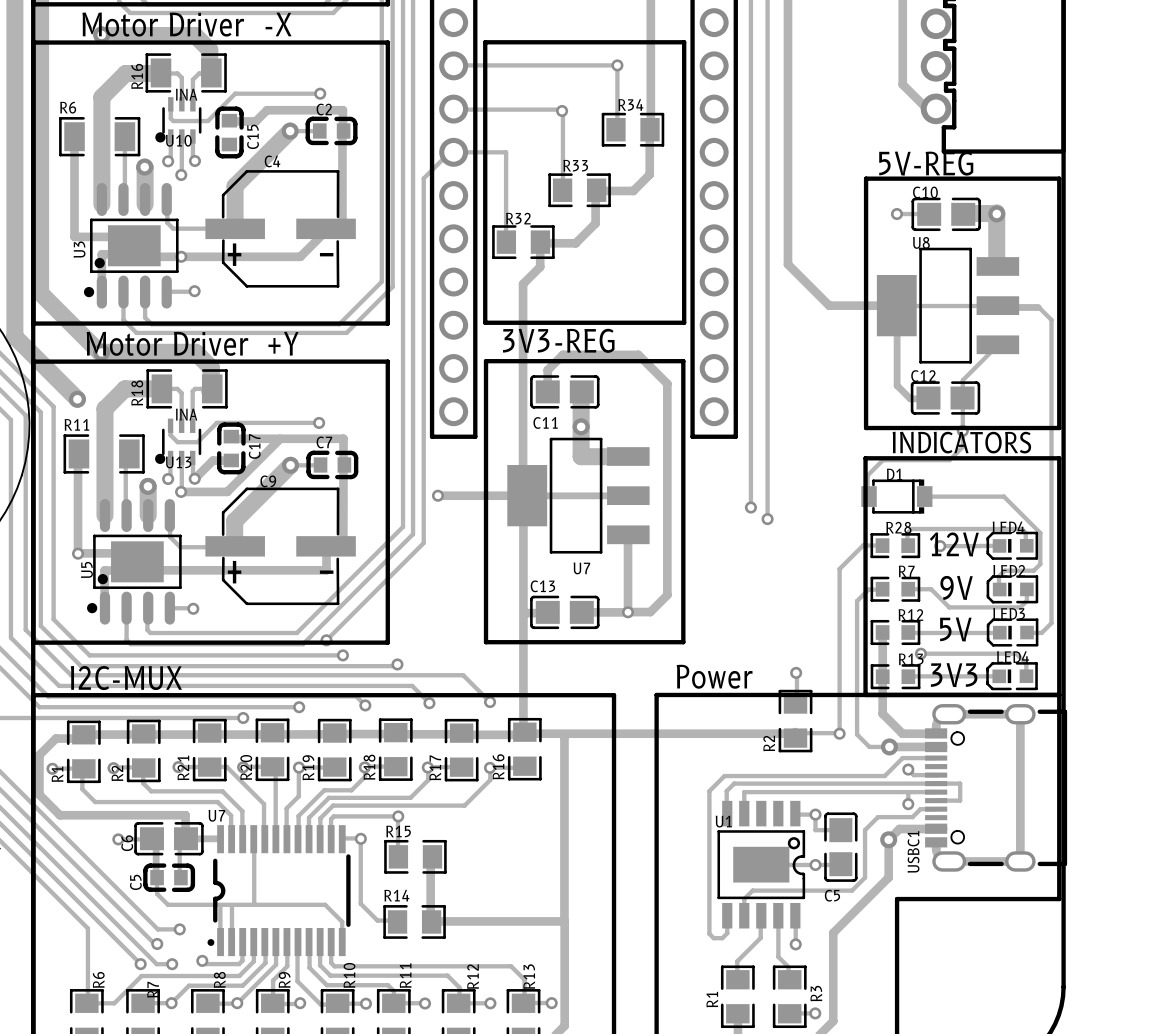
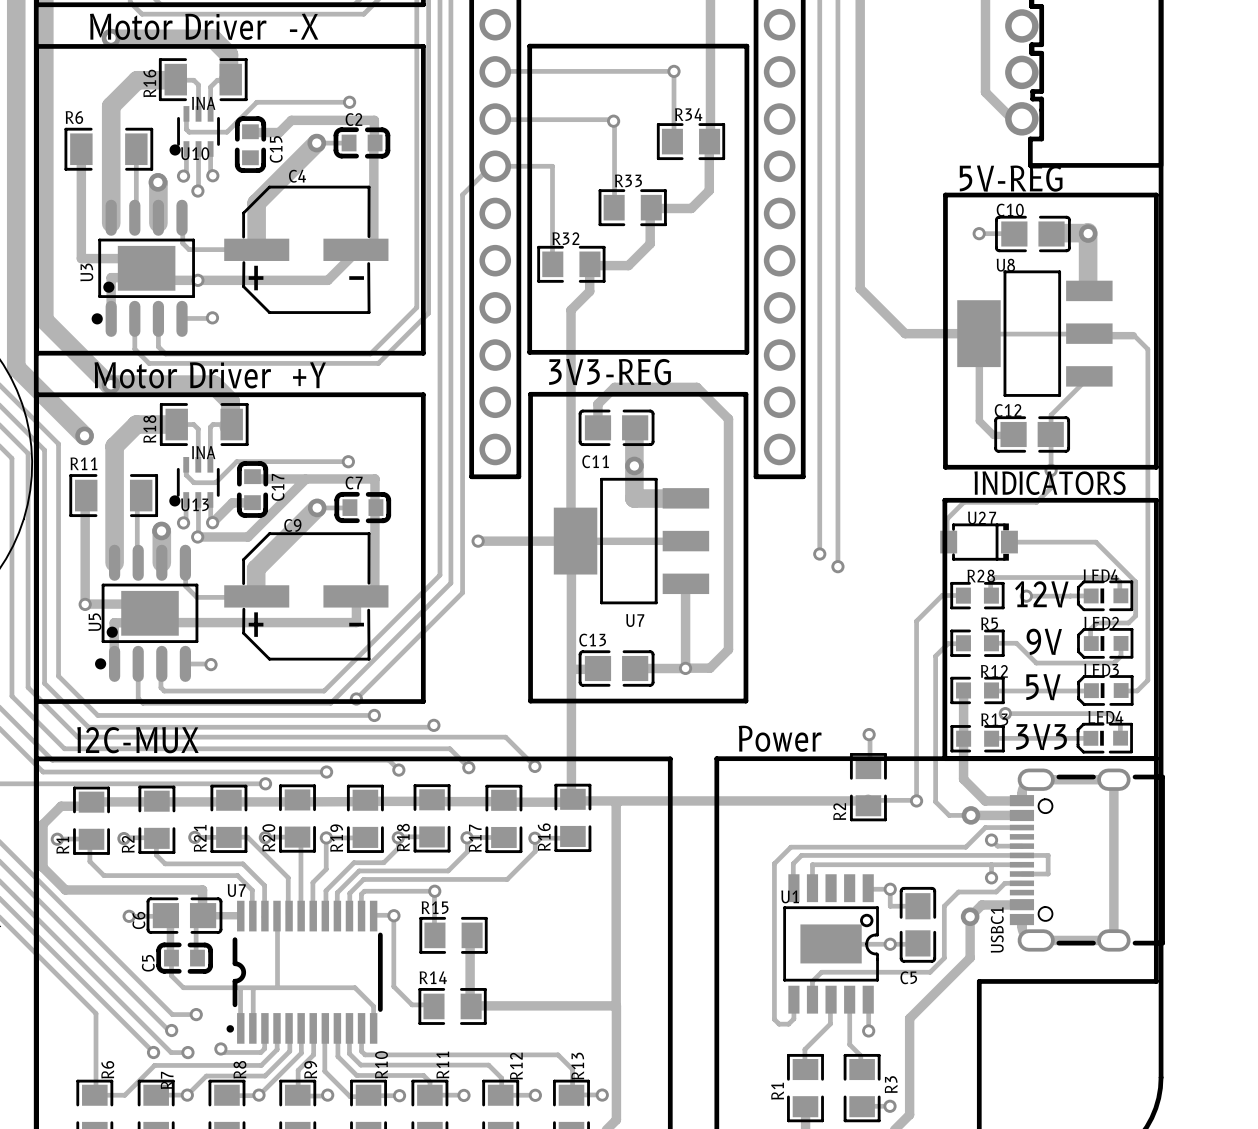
D1 name: D1 (894, 474) -> U27 (982, 518)
R7 name: R7 (906, 571) -> R5 (989, 623)

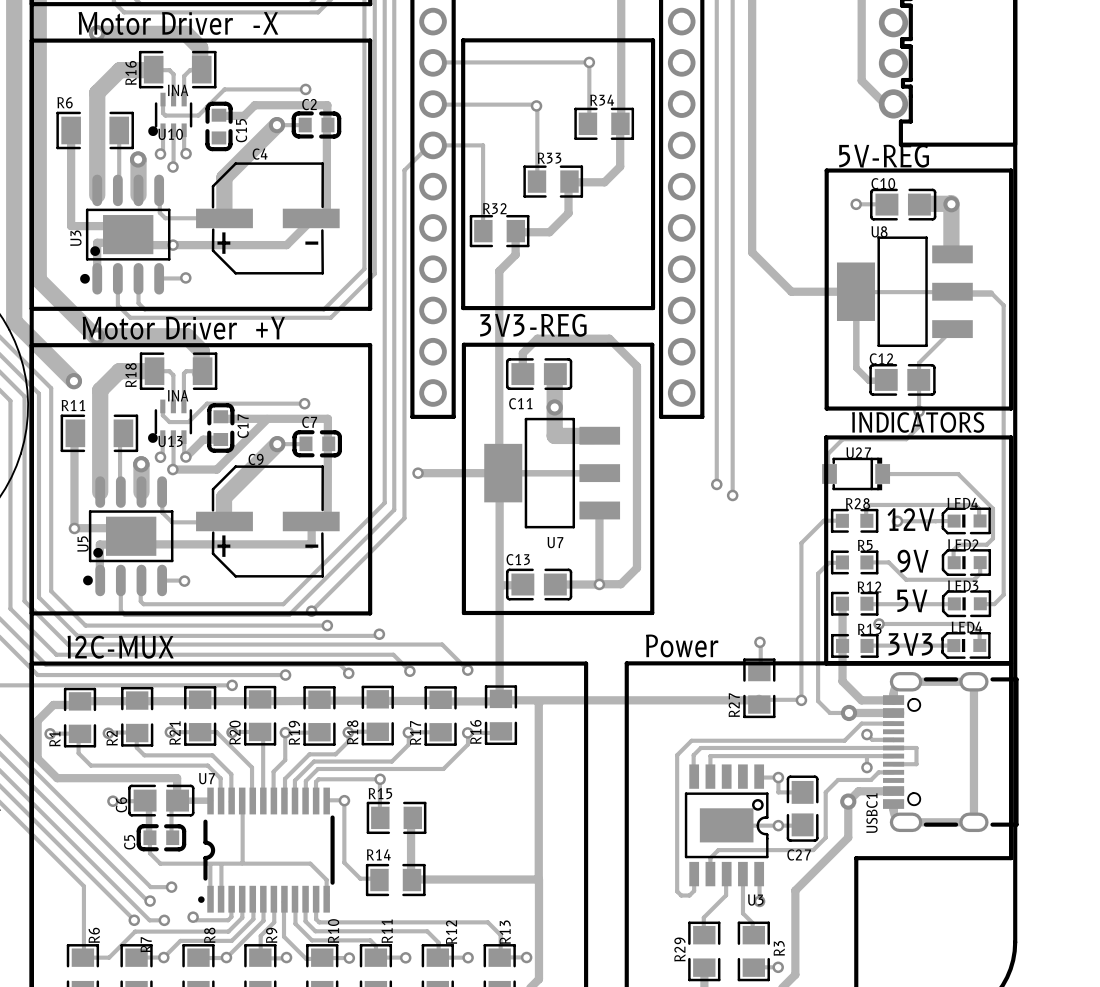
R2 name: R2 (839, 811) -> R27 (734, 705)
U1 name: U1 (790, 896) -> U3 (755, 900)
C5 name: C5 (908, 977) -> C27 (799, 854)
R1 name: R1 (777, 1091) -> R29 (679, 949)

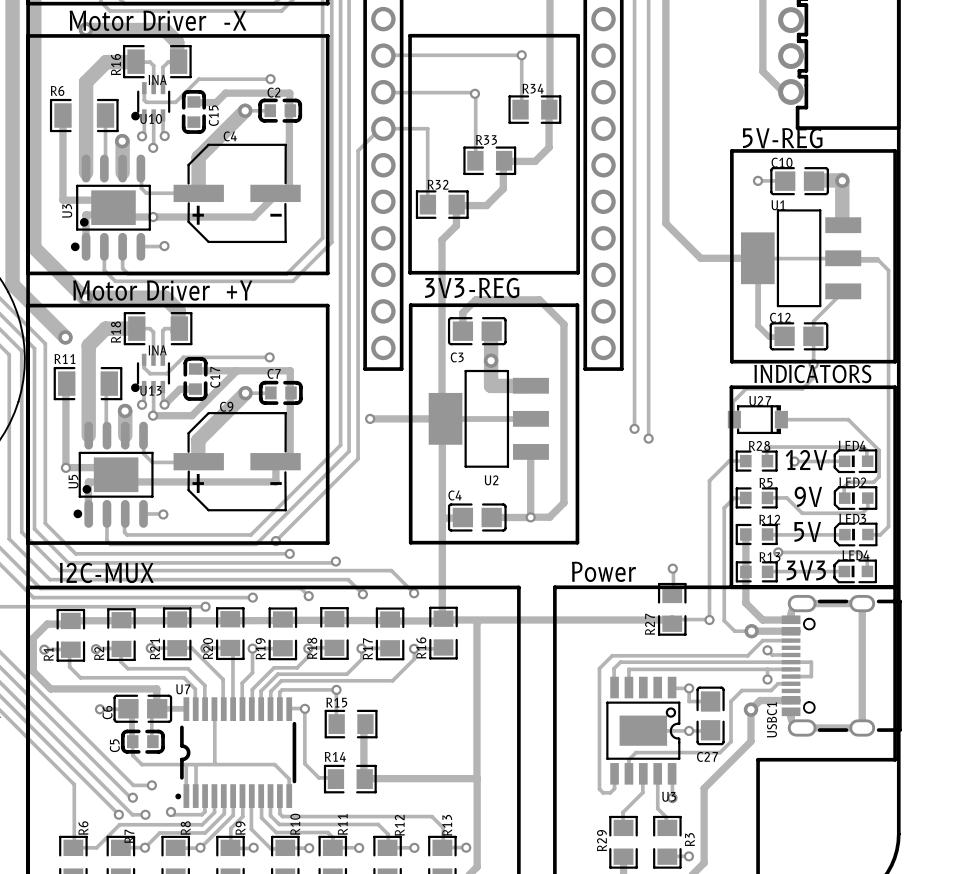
U8 name: U8 (879, 231) -> U1 (778, 205)
C11 name: C11 (520, 403) -> C3 (457, 357)
U7 name: U7 (555, 542) -> U2 (491, 480)
C13 name: C13 (518, 559) -> C4 (455, 495)

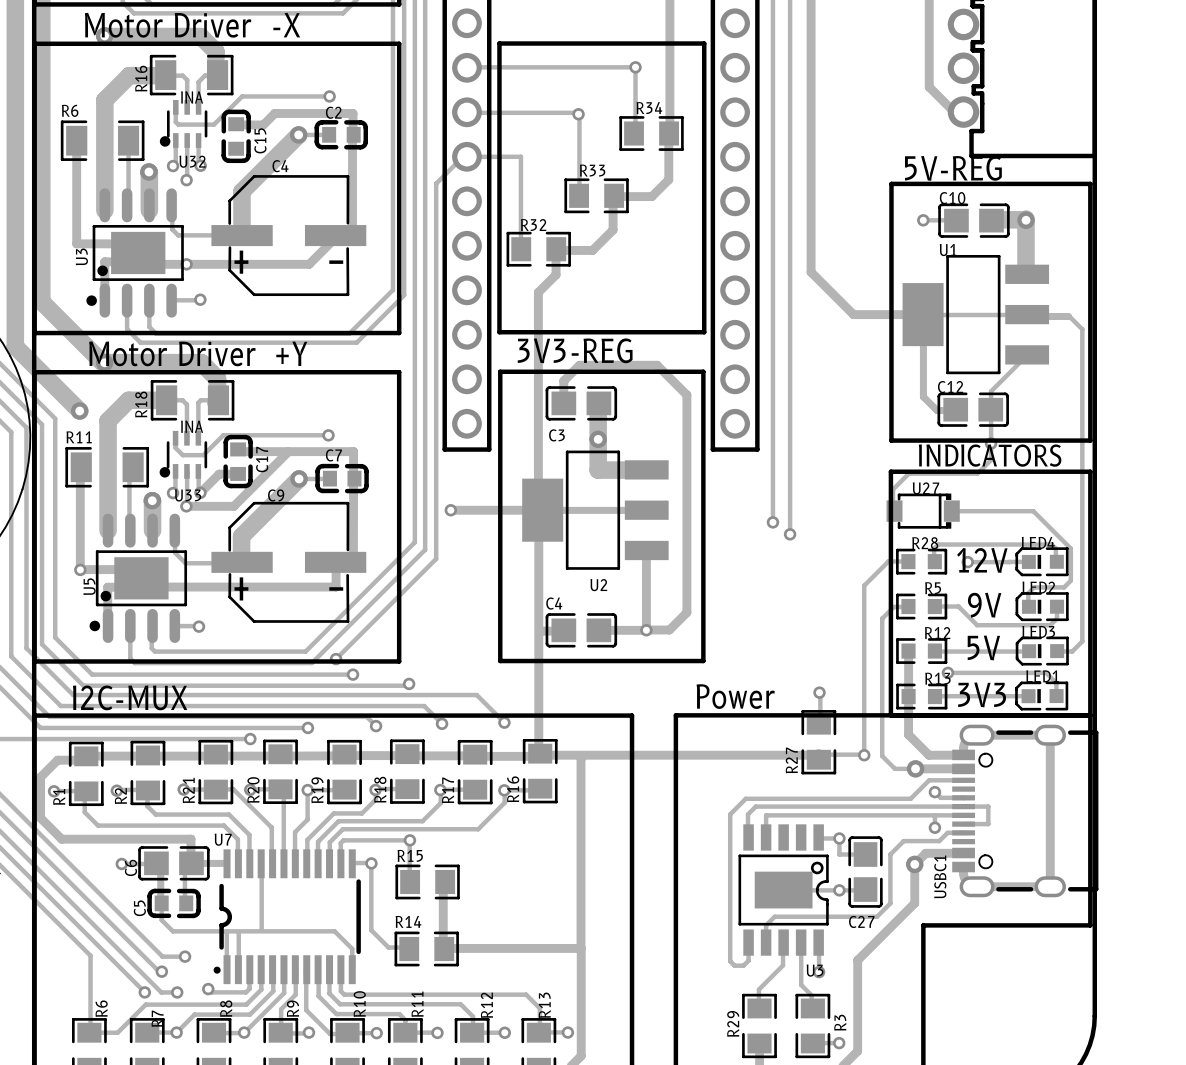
U10 name: U10 (151, 118) -> U32 (192, 161)
U13 name: U13 (150, 390) -> U33 (188, 495)
LED4 name: LED4 (856, 555) -> LED1 (1042, 676)

